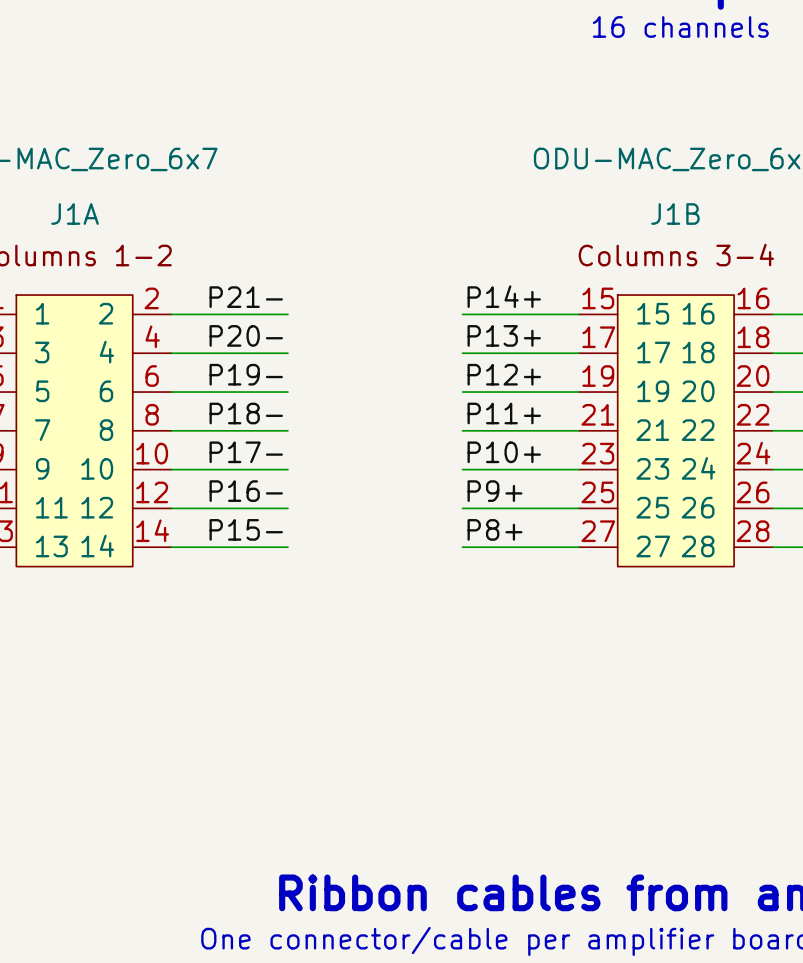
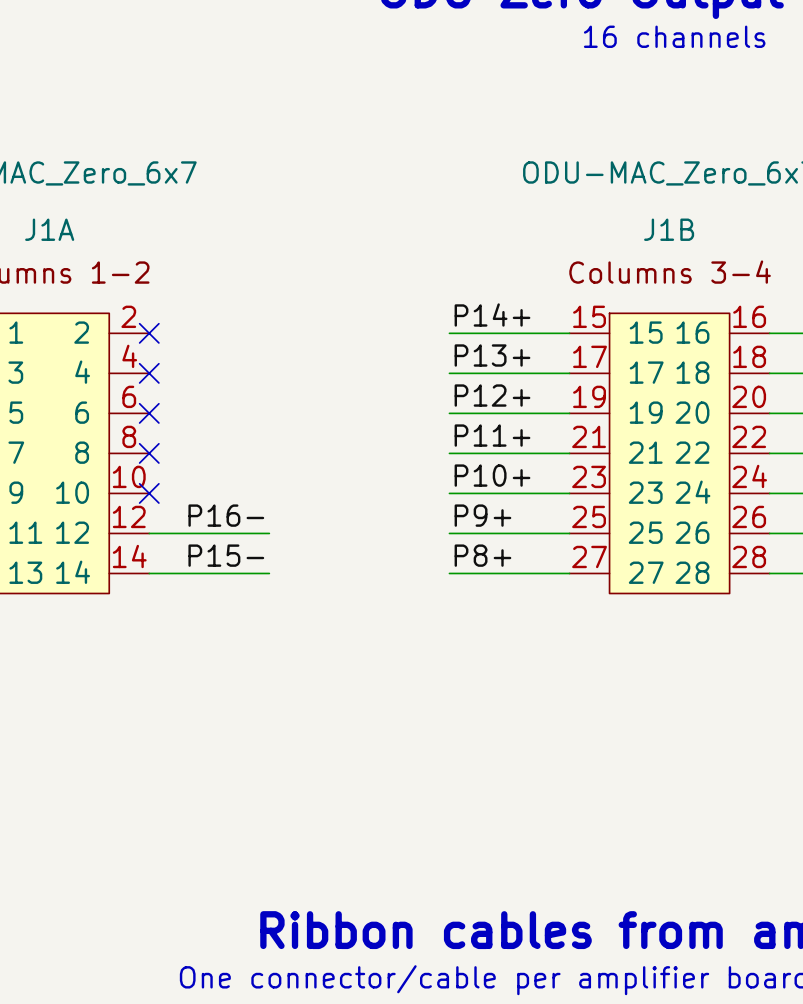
label: P21- (246, 297) -> none
wire: (171, 314) (287, 314) -> none
no-connect mark: none -> (149, 333)
label: P20- (246, 335) -> none
wire: (171, 353) (287, 353) -> none
no-connect mark: none -> (149, 373)
label: P19- (246, 374) -> none
wire: (171, 392) (287, 392) -> none
no-connect mark: none -> (149, 413)
label: P18- (246, 413) -> none
wire: (171, 430) (287, 430) -> none
no-connect mark: none -> (149, 453)
label: P17- (246, 452) -> none
wire: (171, 469) (287, 469) -> none
no-connect mark: none -> (149, 493)

